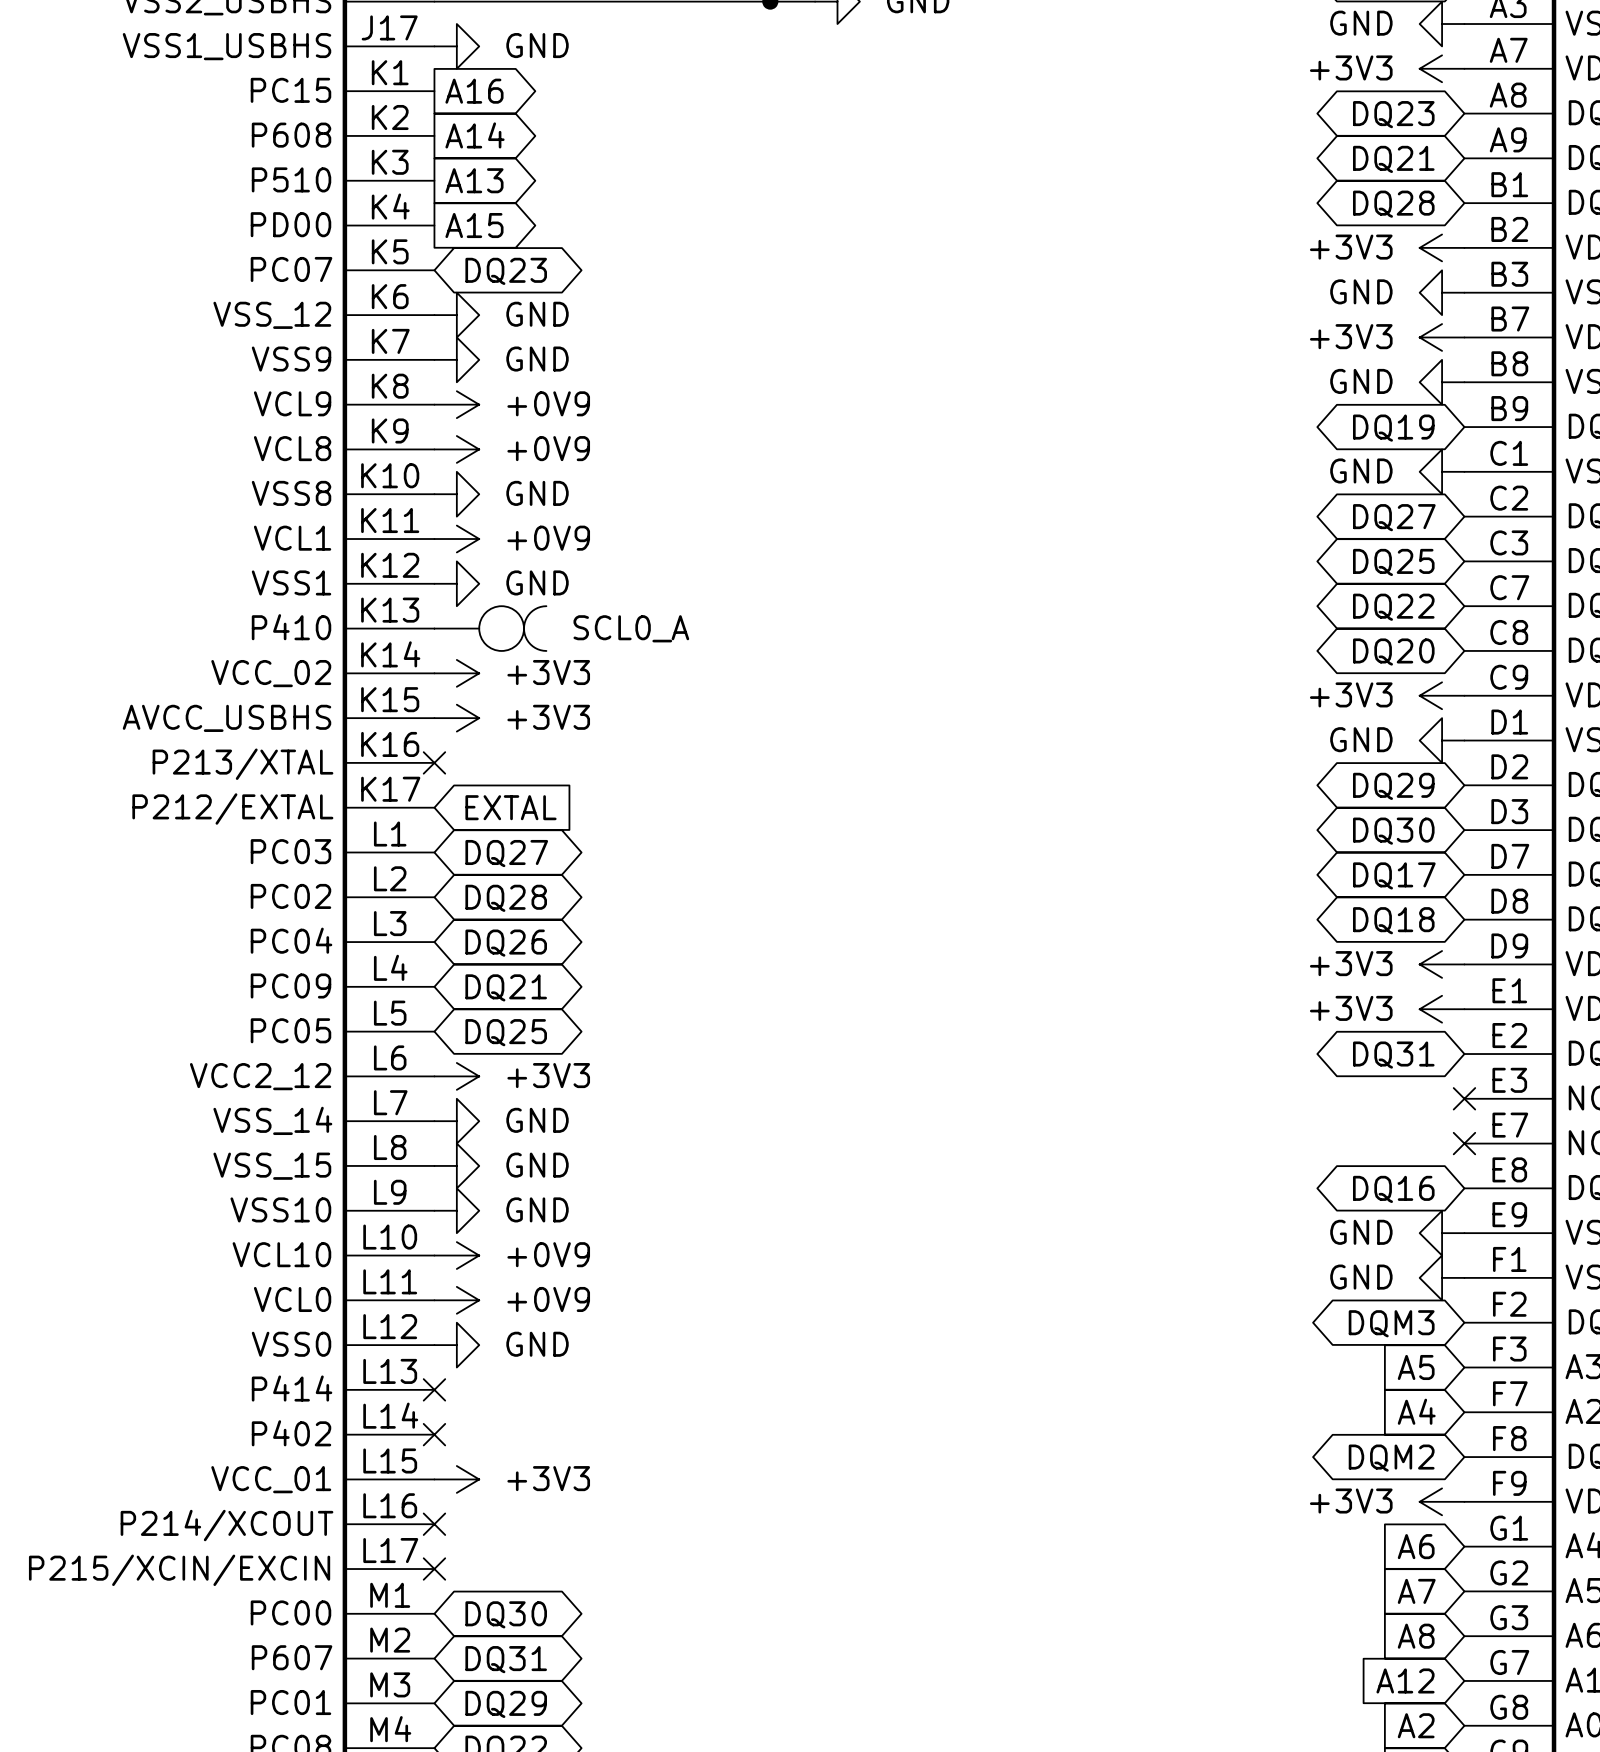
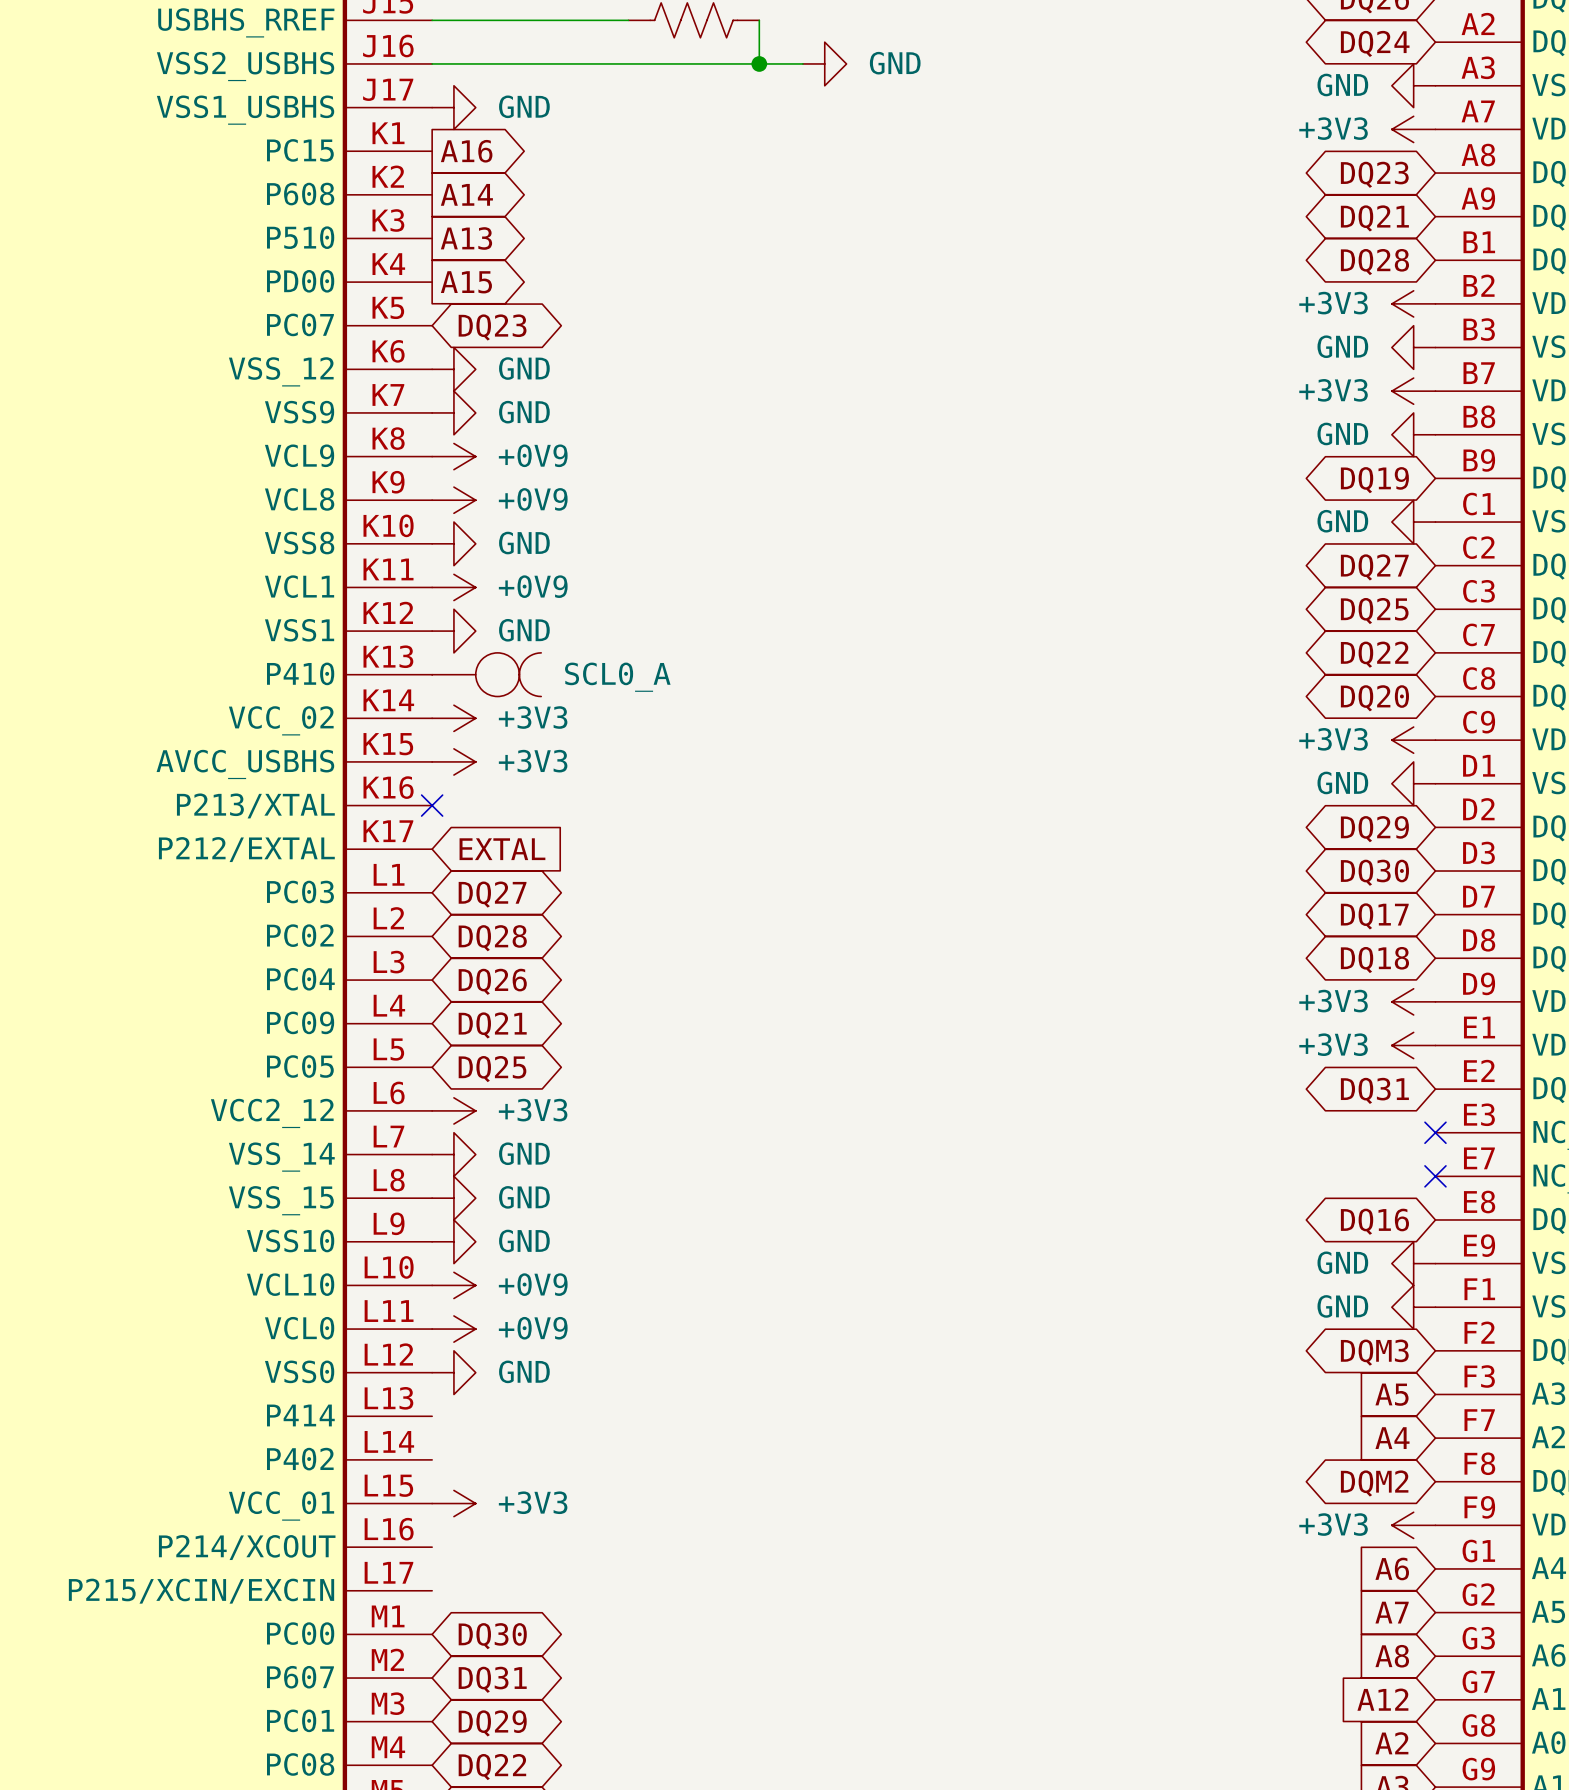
no-connect mark: (434, 1389) -> none
no-connect mark: (434, 1434) -> none
no-connect mark: (434, 1524) -> none
no-connect mark: (434, 1569) -> none

